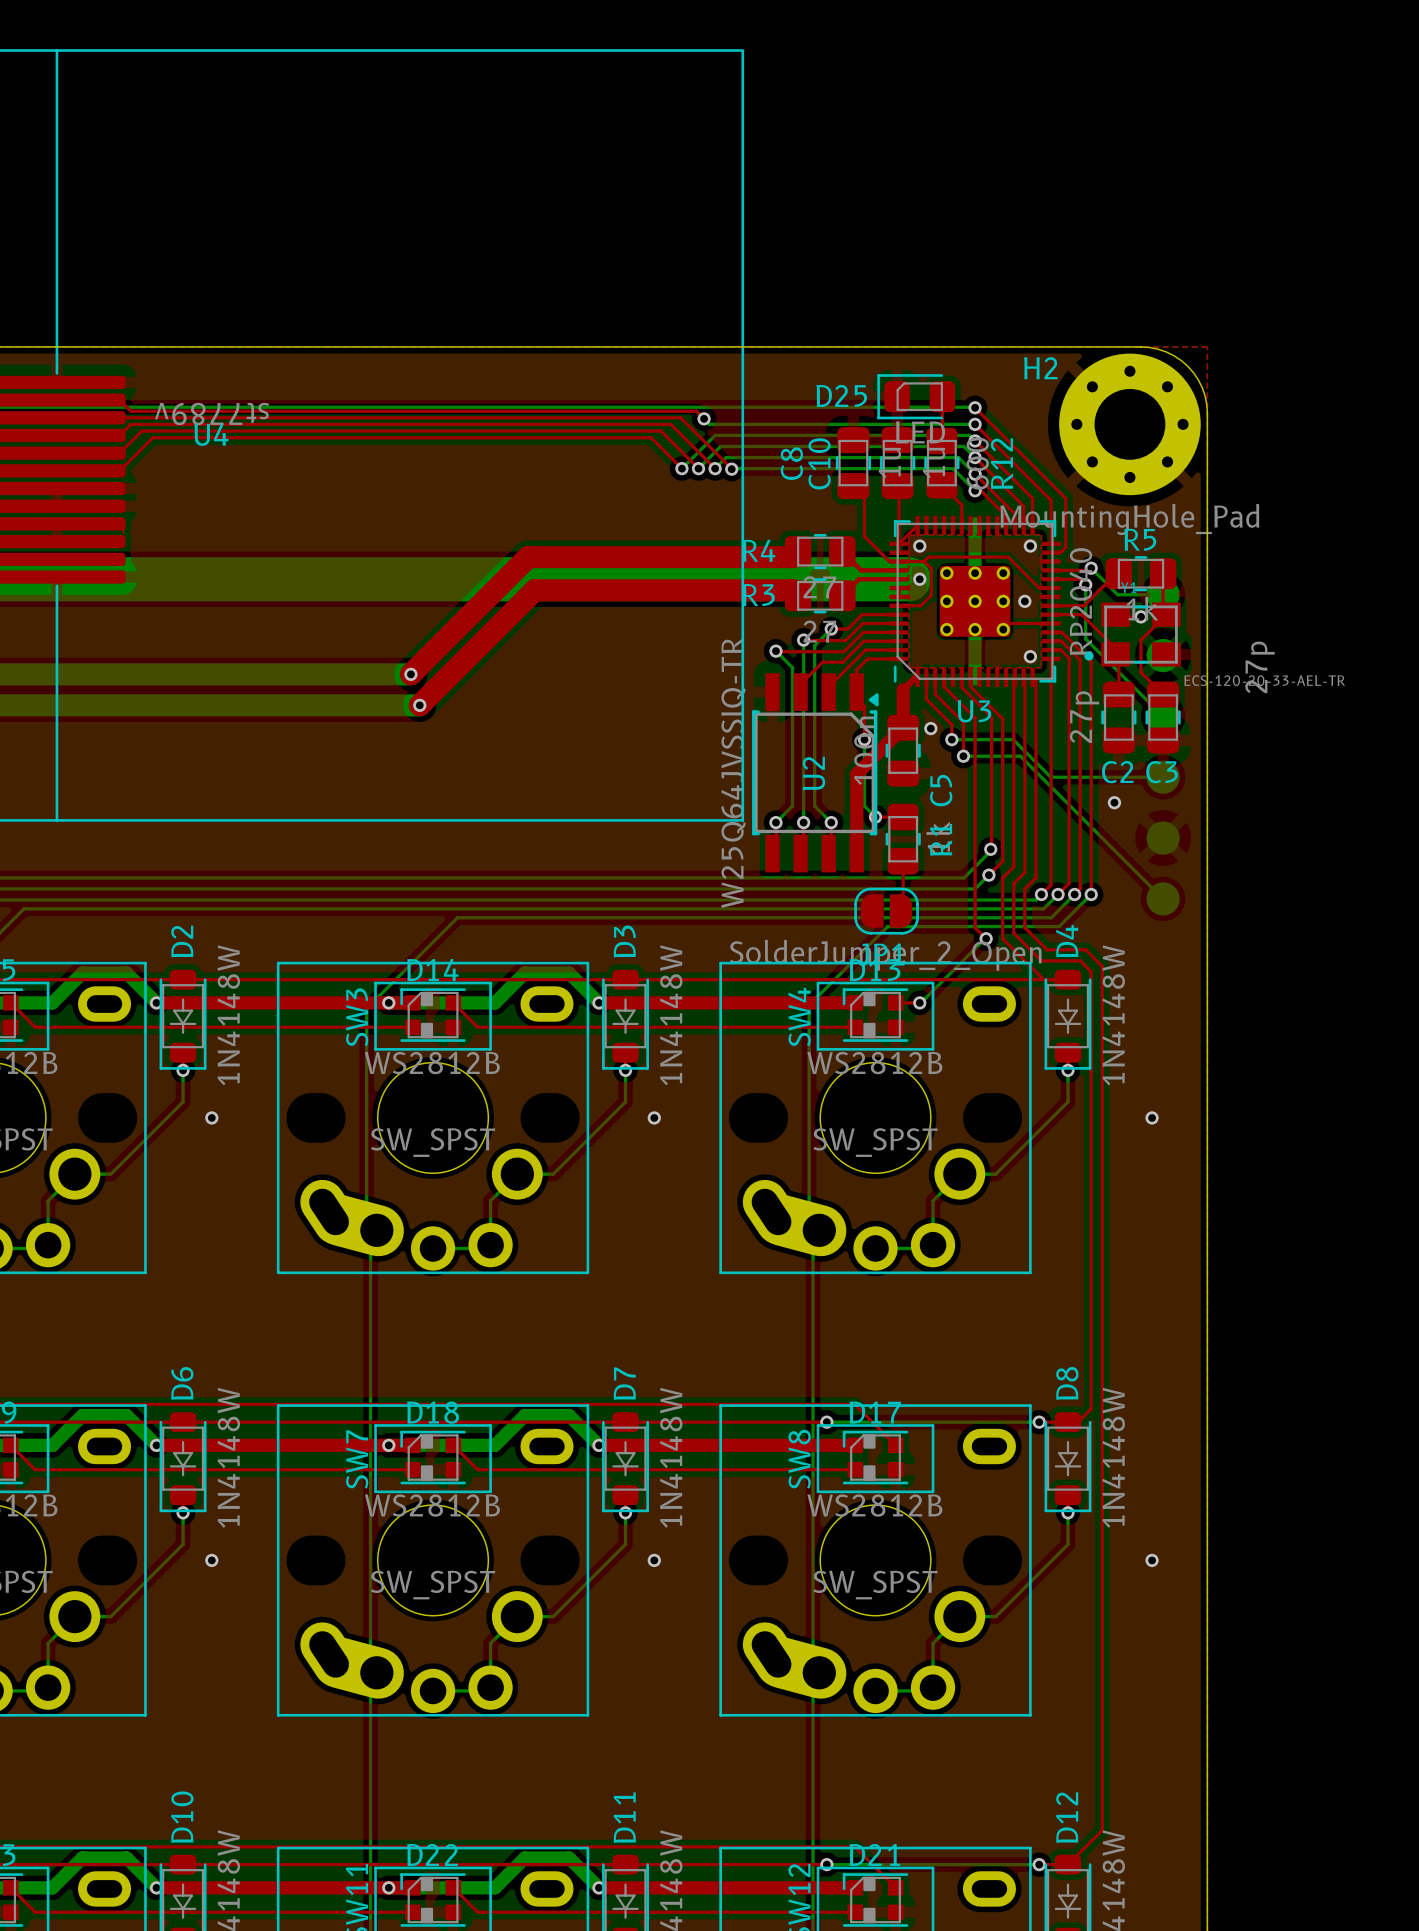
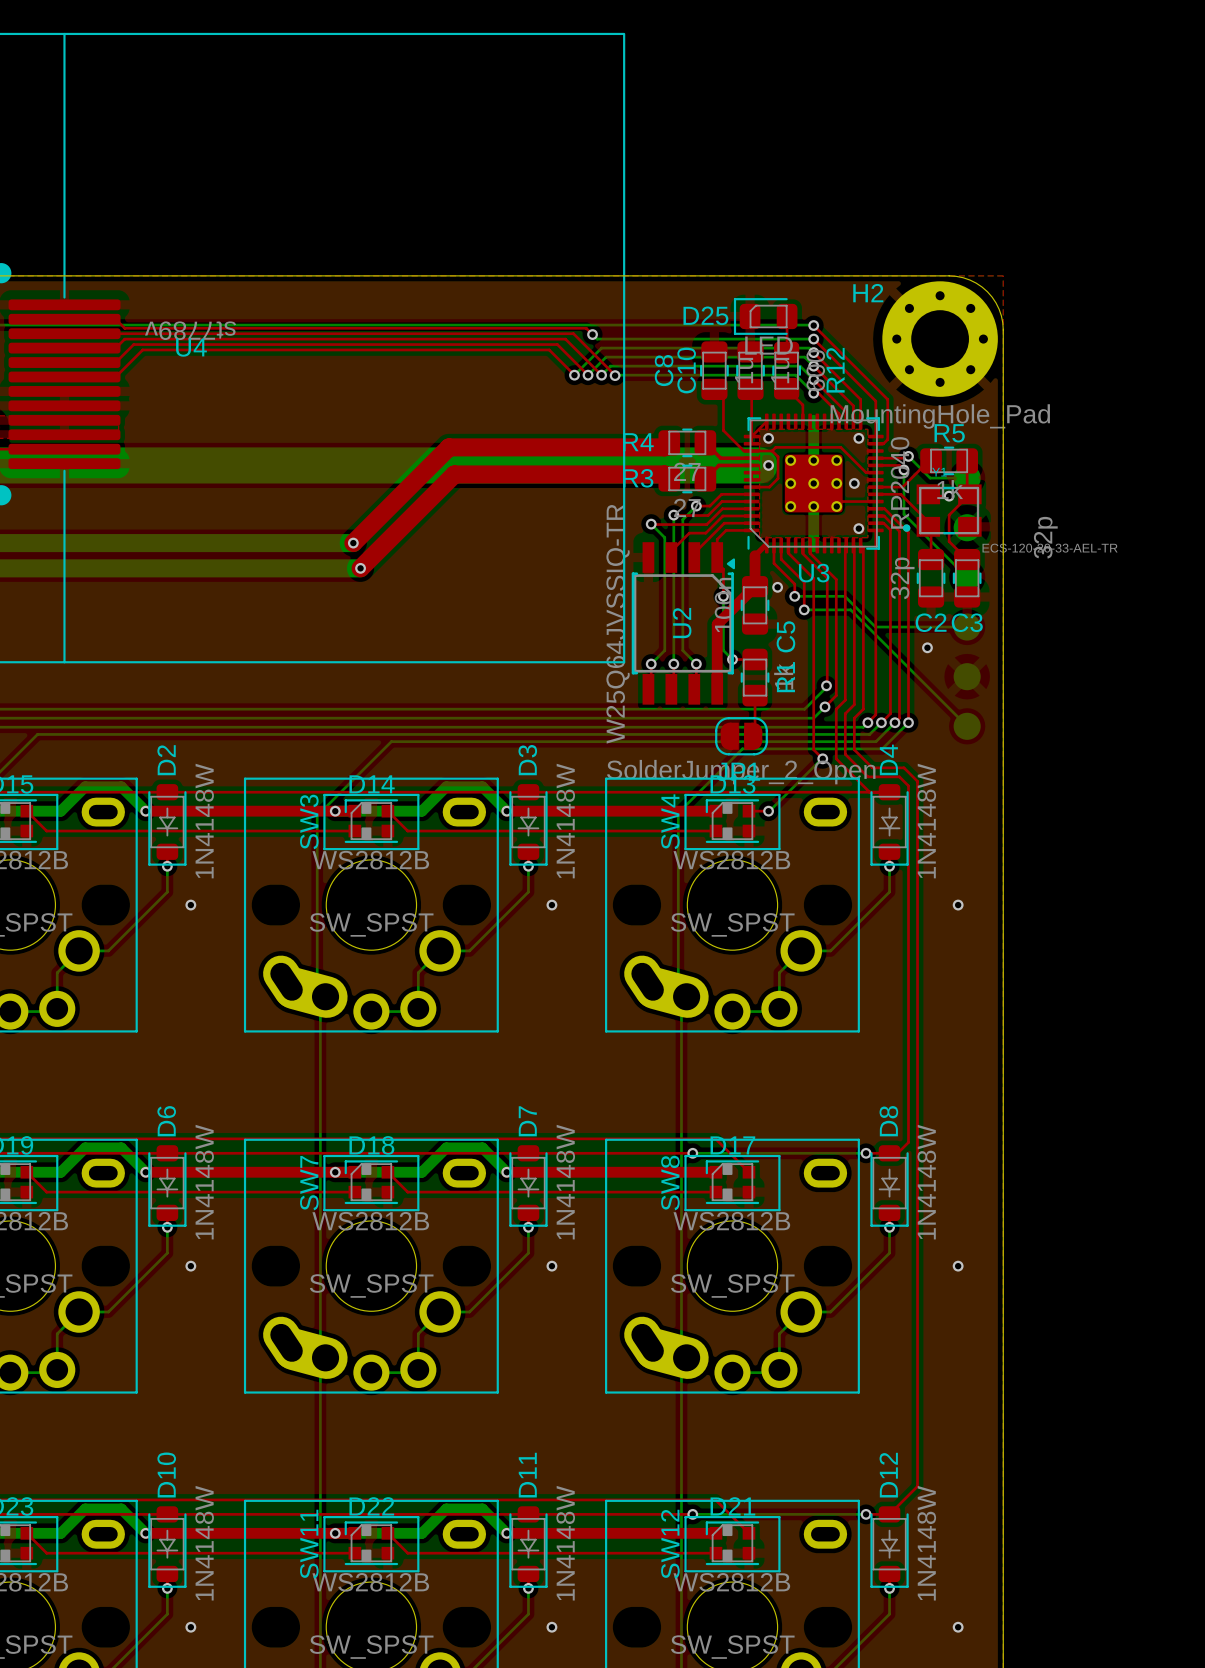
C3 value: 27p (1259, 667) -> 32p (1045, 537)
C2 value: 27p (1084, 717) -> 32p (902, 578)

